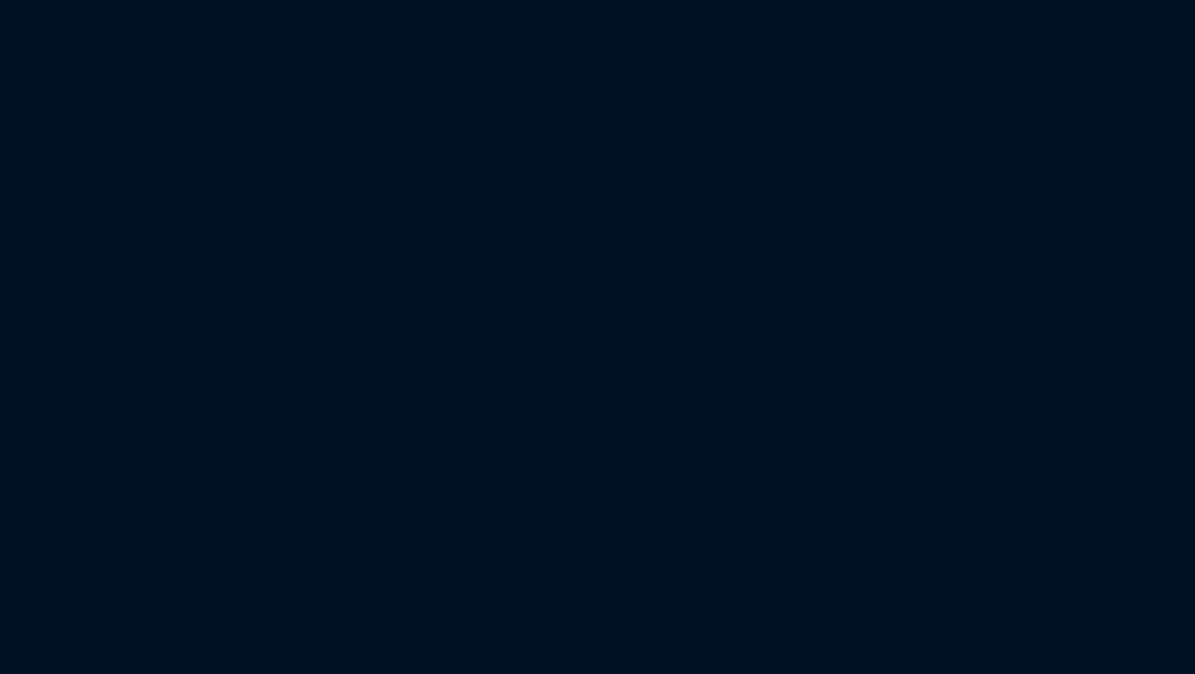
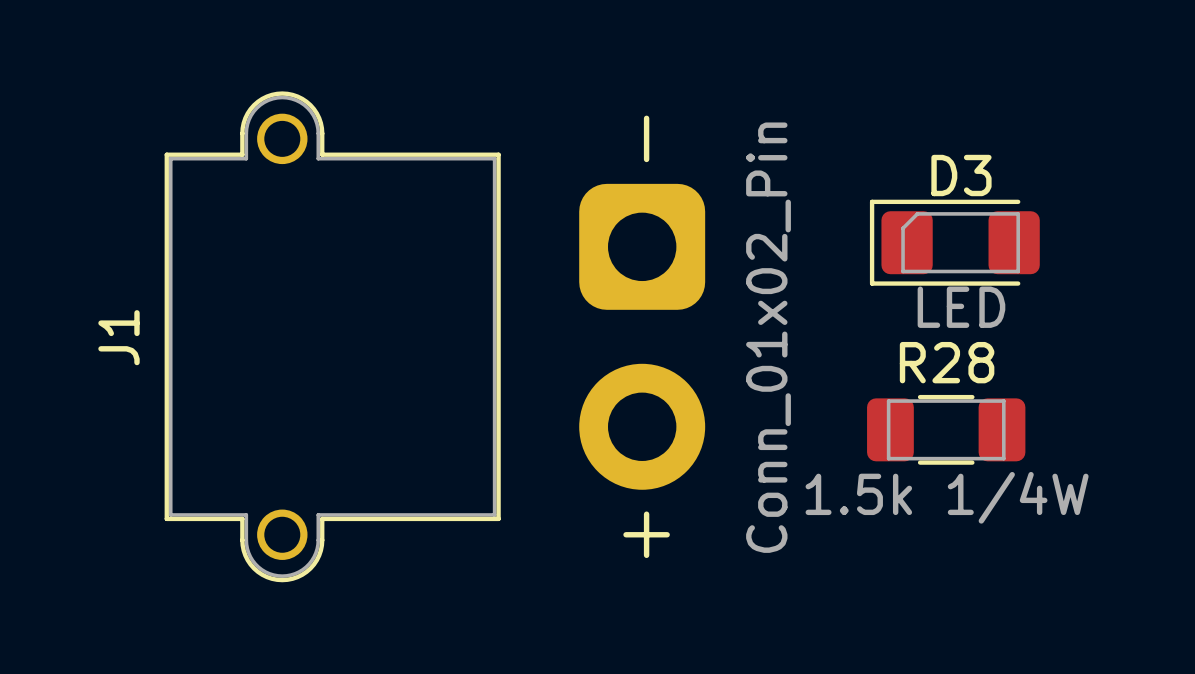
D3: none -> LED (954, 242)
J1: none -> Conn_01x02_Pin (434, 336)
R28: none -> 1.5k 1/4W (946, 429)

